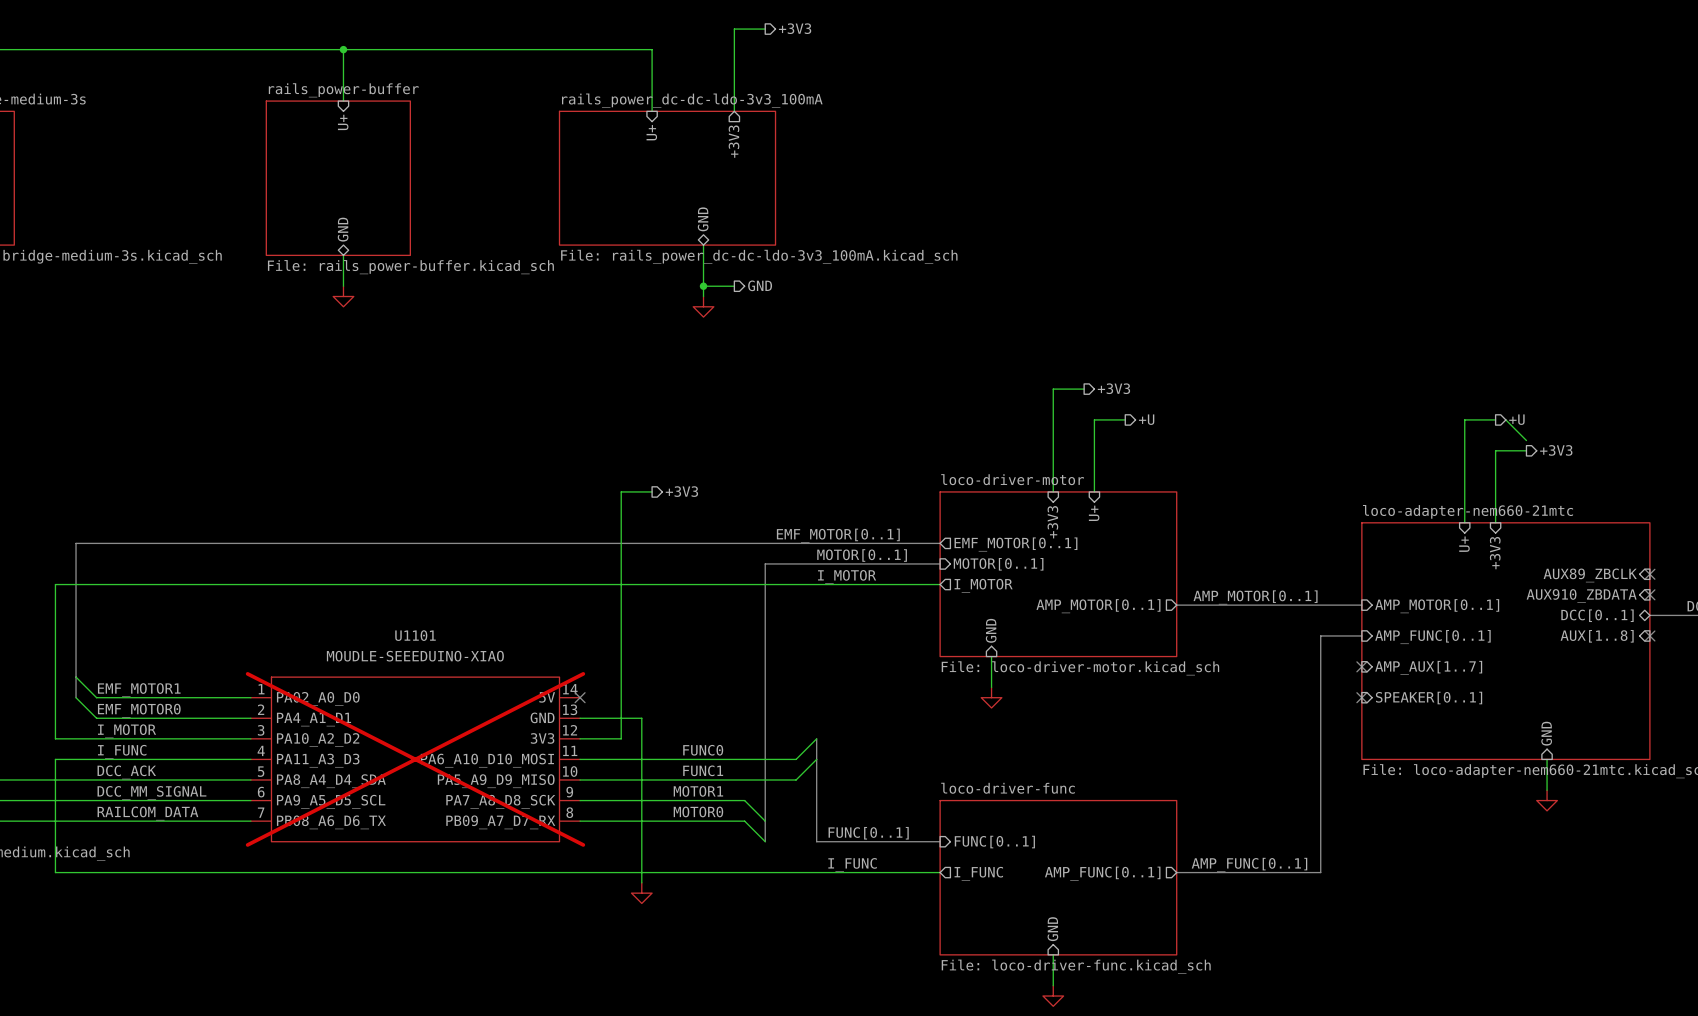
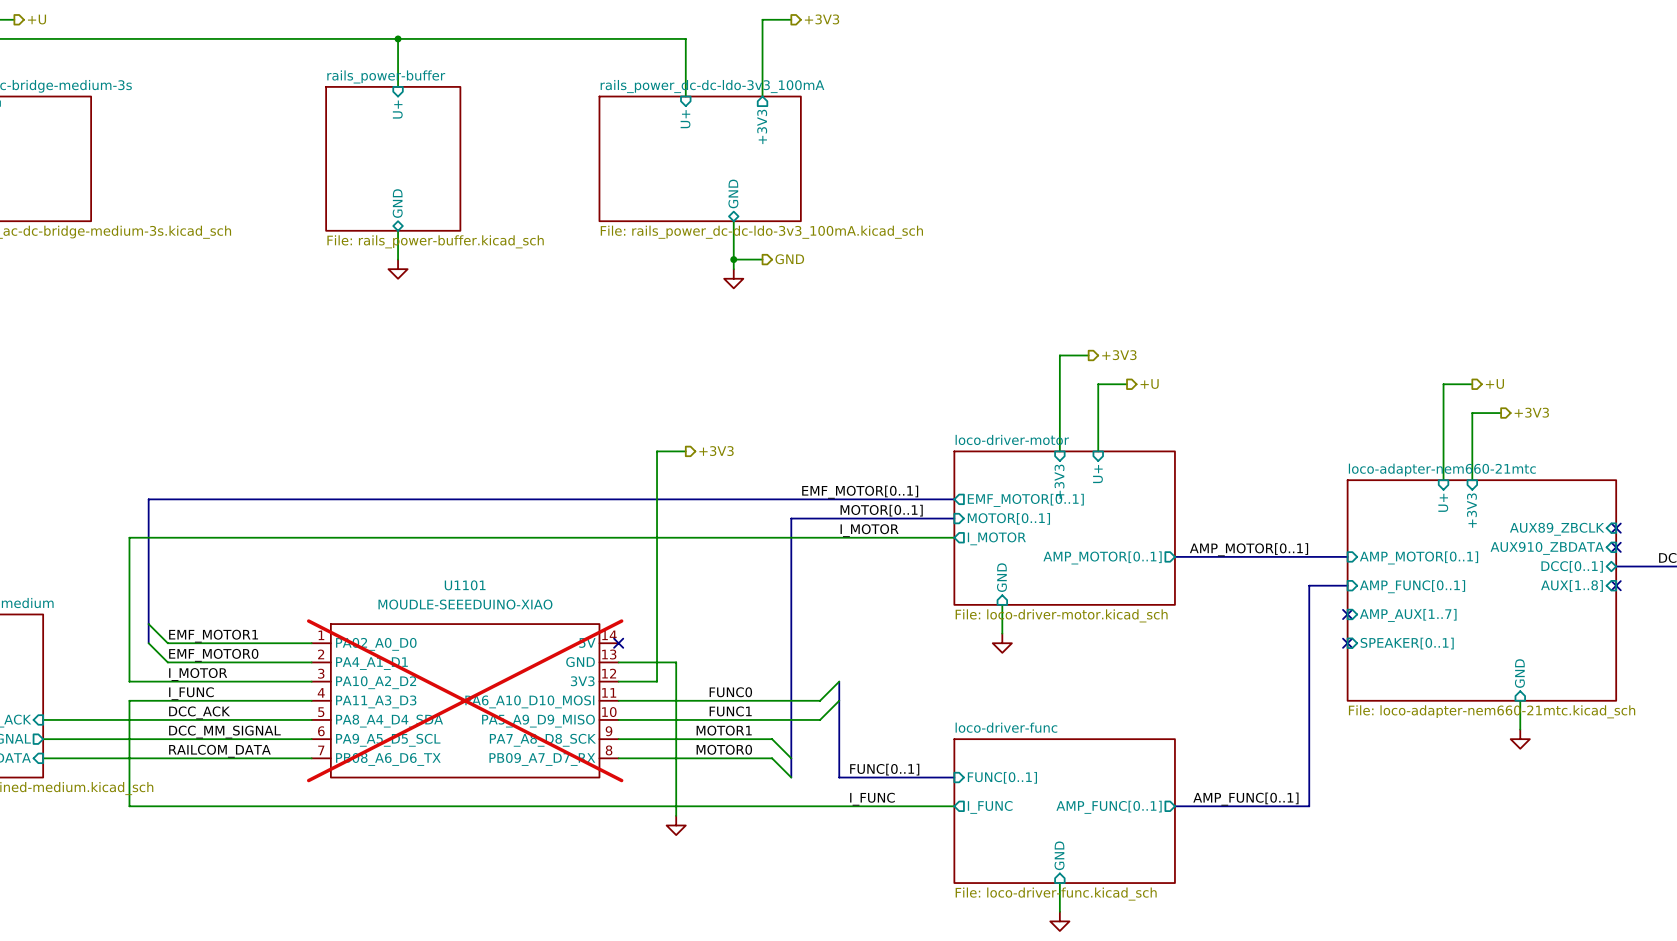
wire: (1505, 419) (1526, 440) -> none

